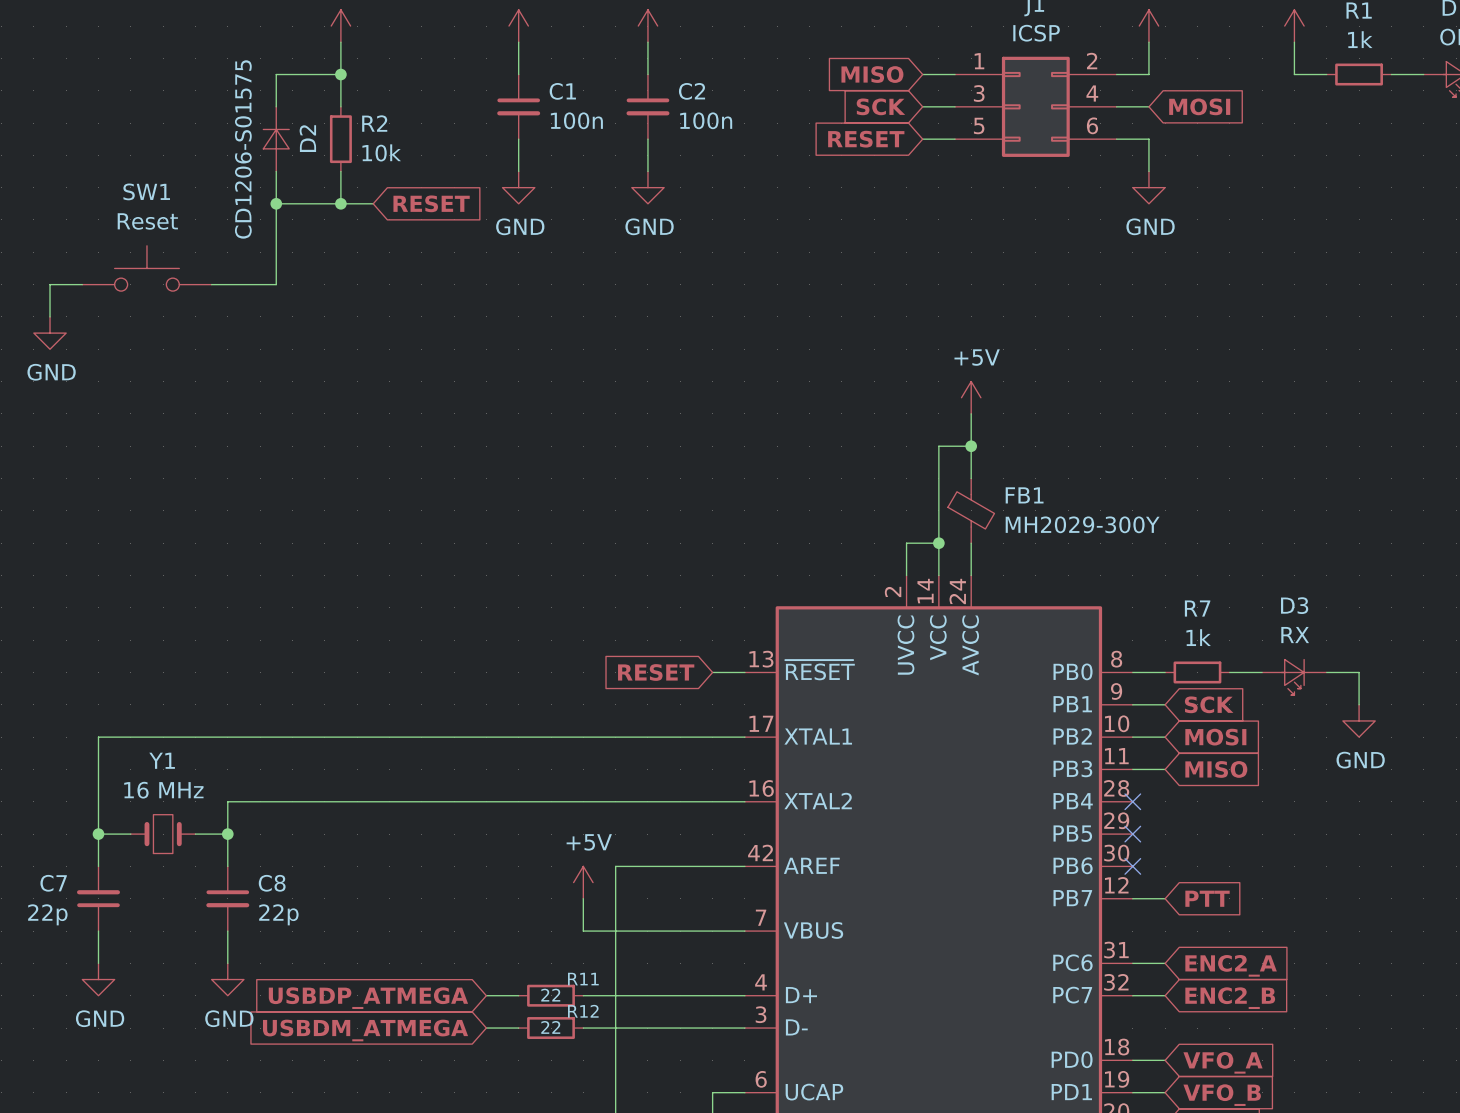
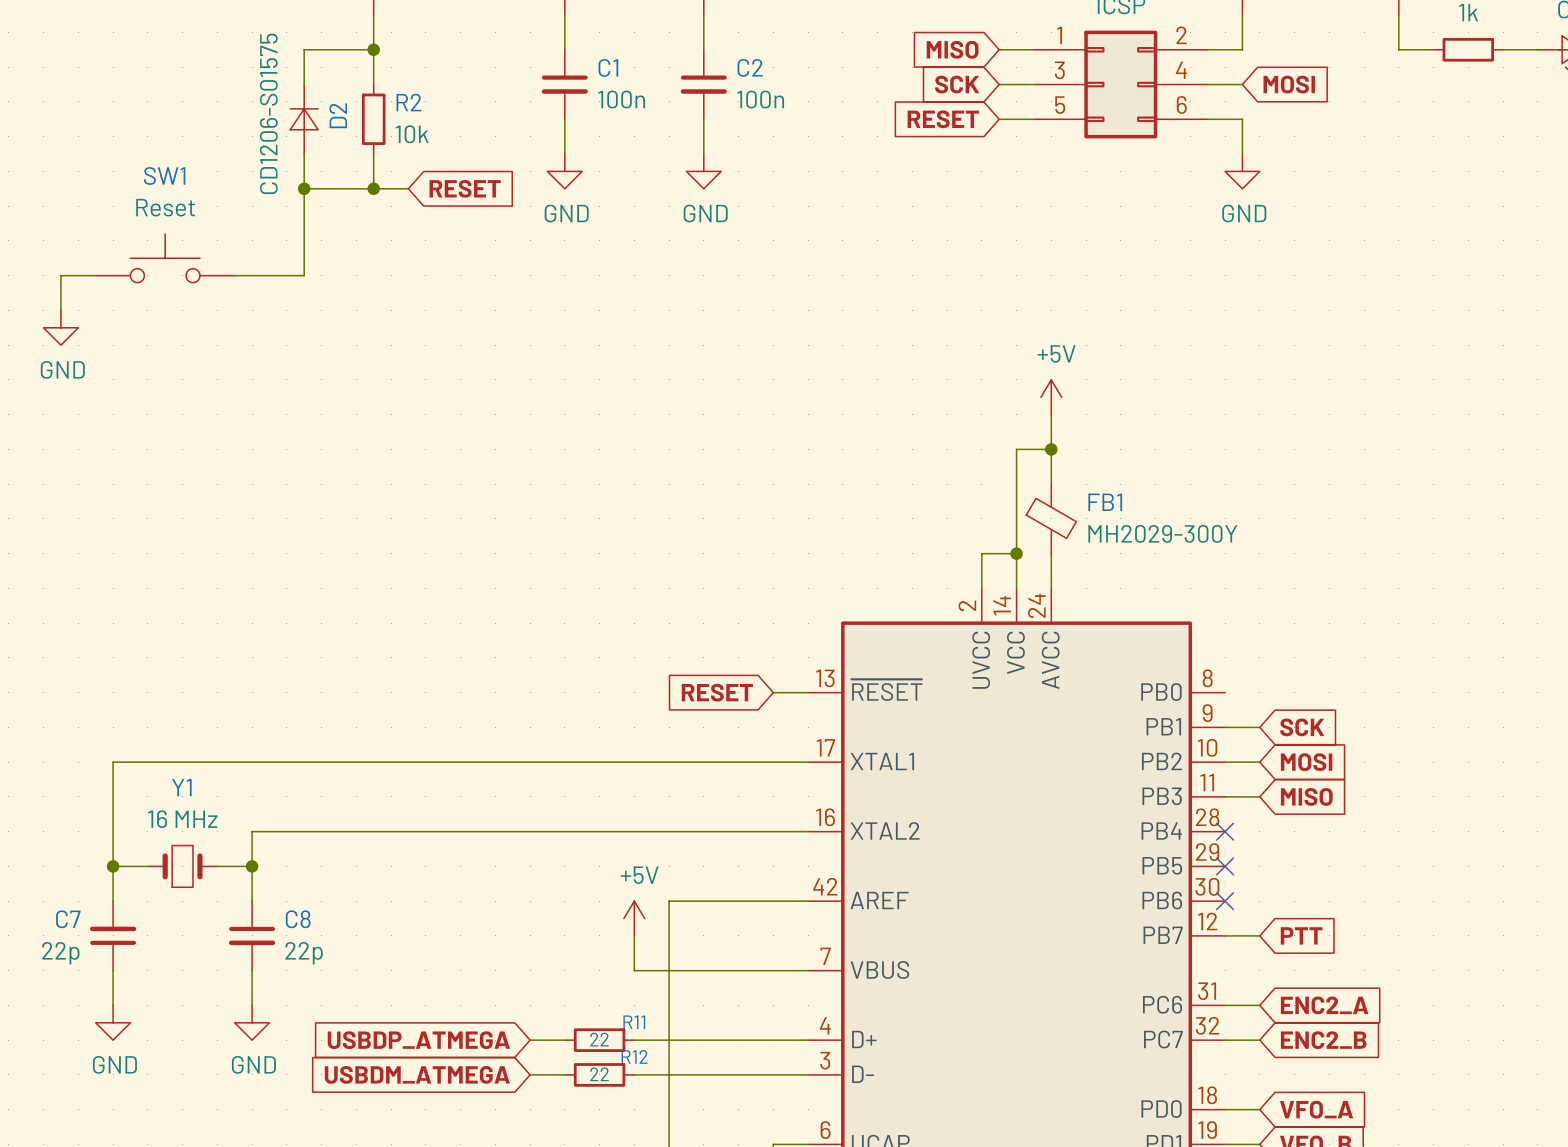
wire: (1132, 672) (1165, 672) -> none
R7: 1k (1197, 672) -> none
wire: (1229, 672) (1262, 672) -> none
wire: (1326, 672) (1359, 672) (1359, 704) -> none
D3: RX (1294, 677) -> none
power symbol: GND (1359, 720) -> none

